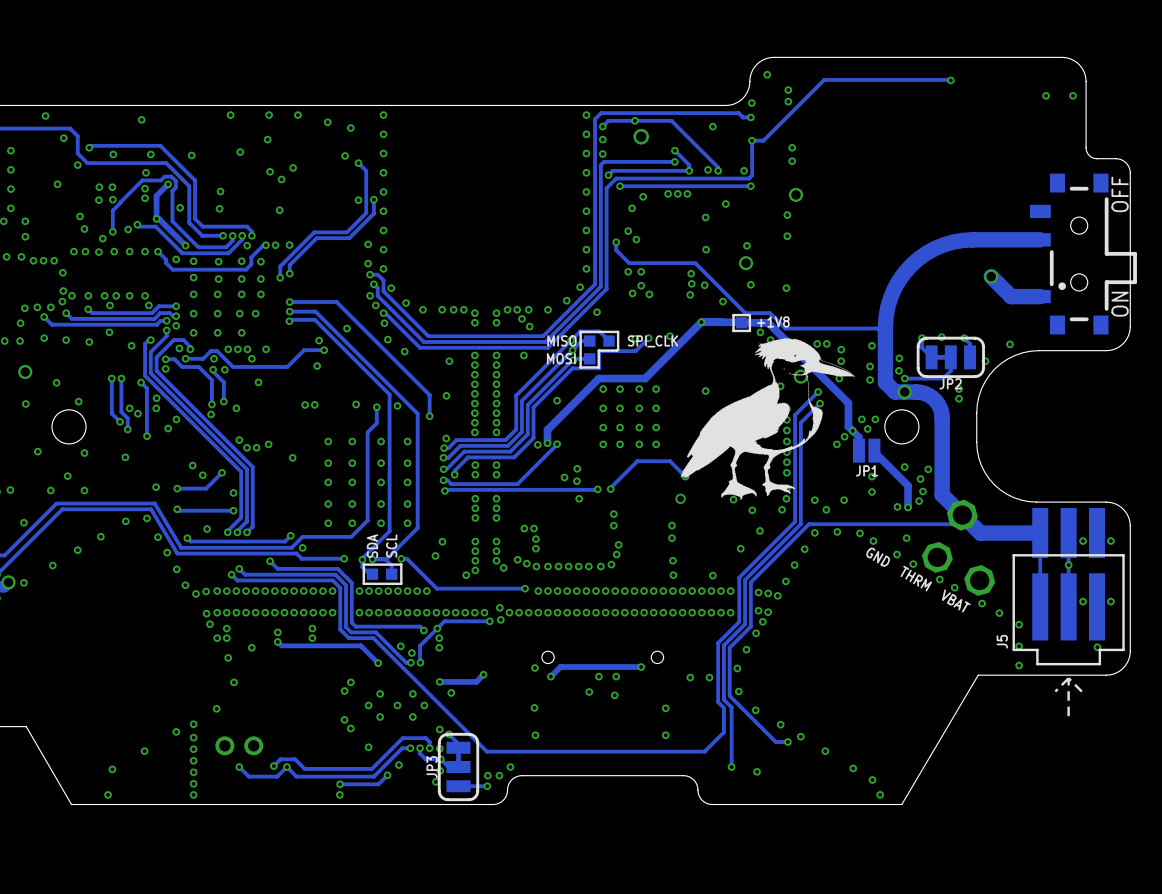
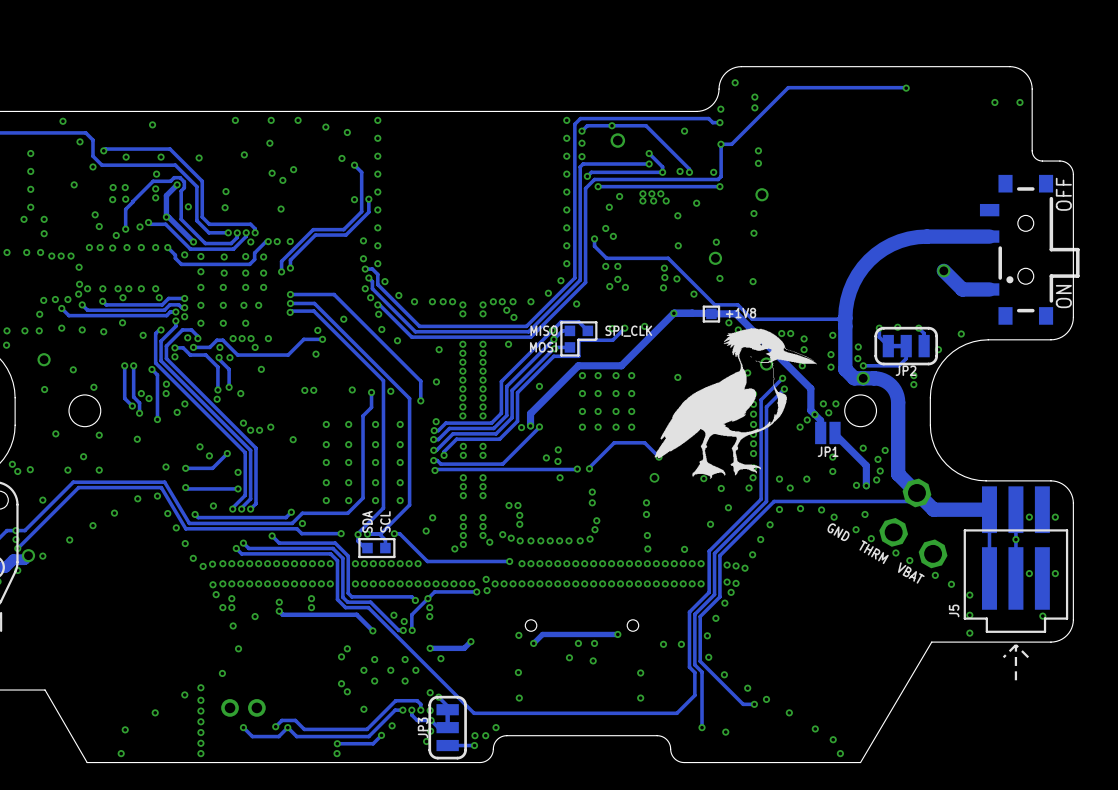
via: none -> (642, 200)
via: none -> (653, 200)
via: none -> (666, 200)

